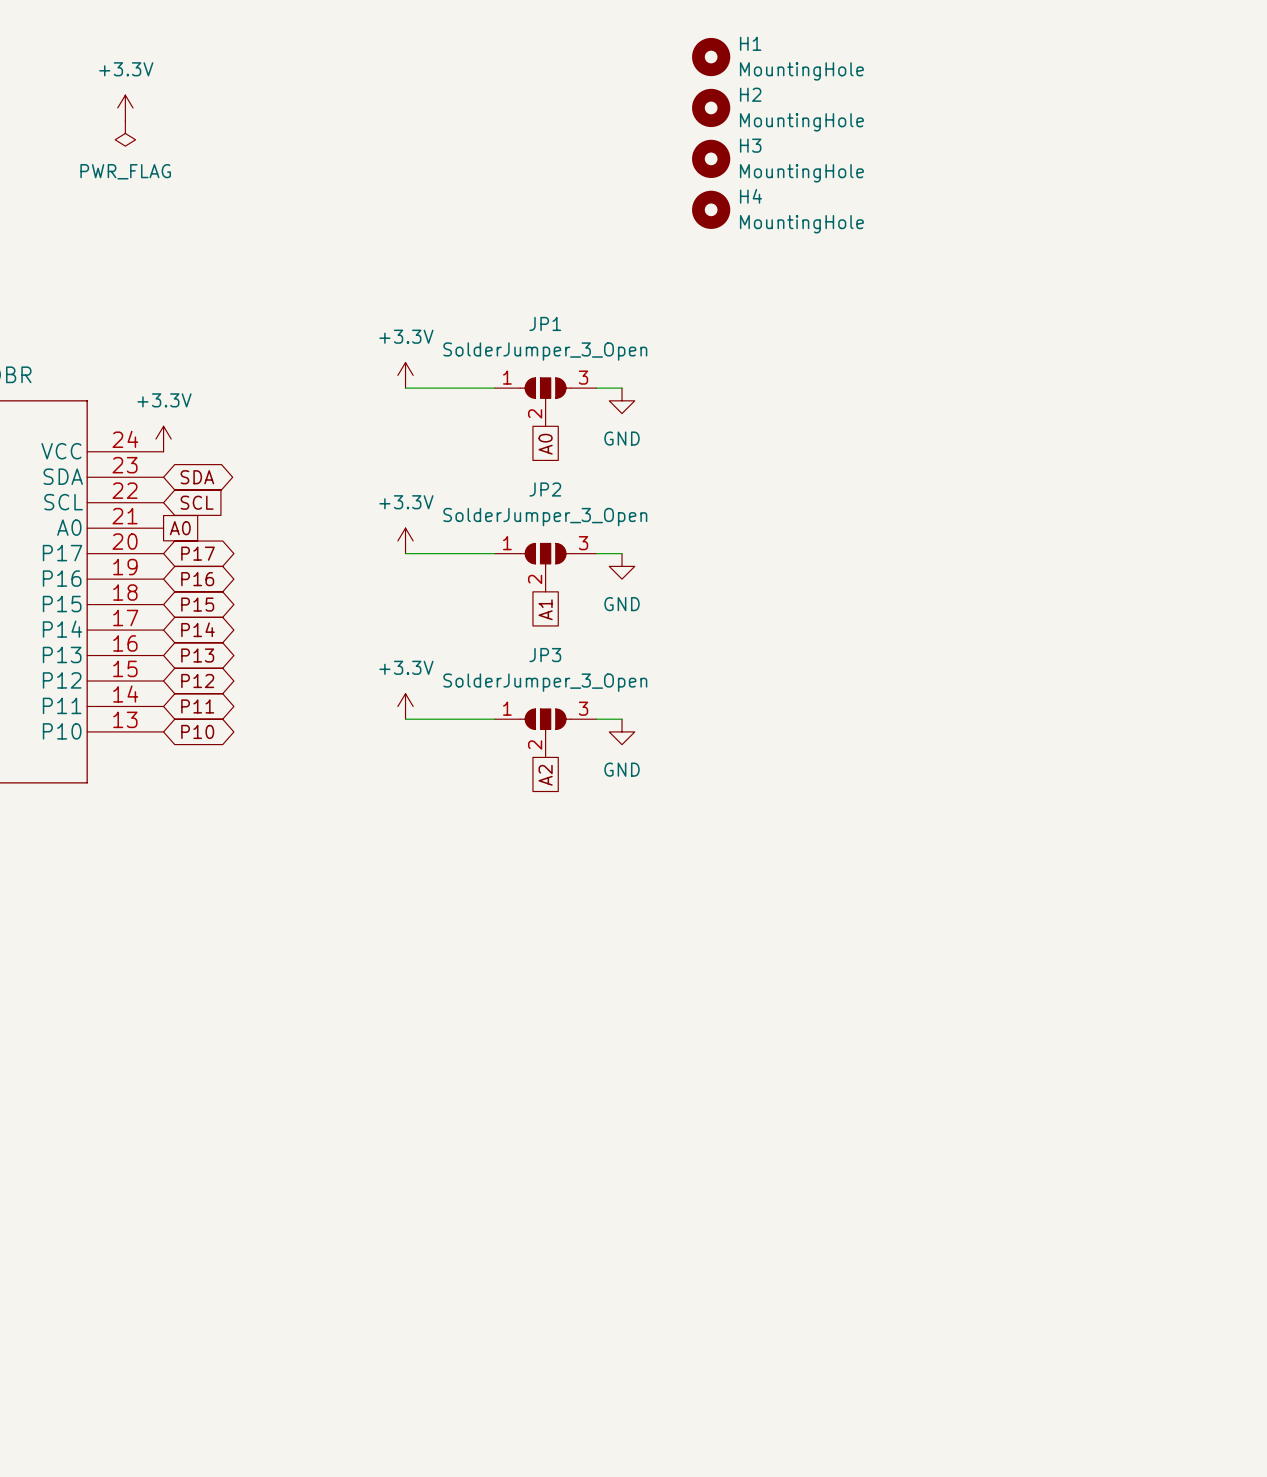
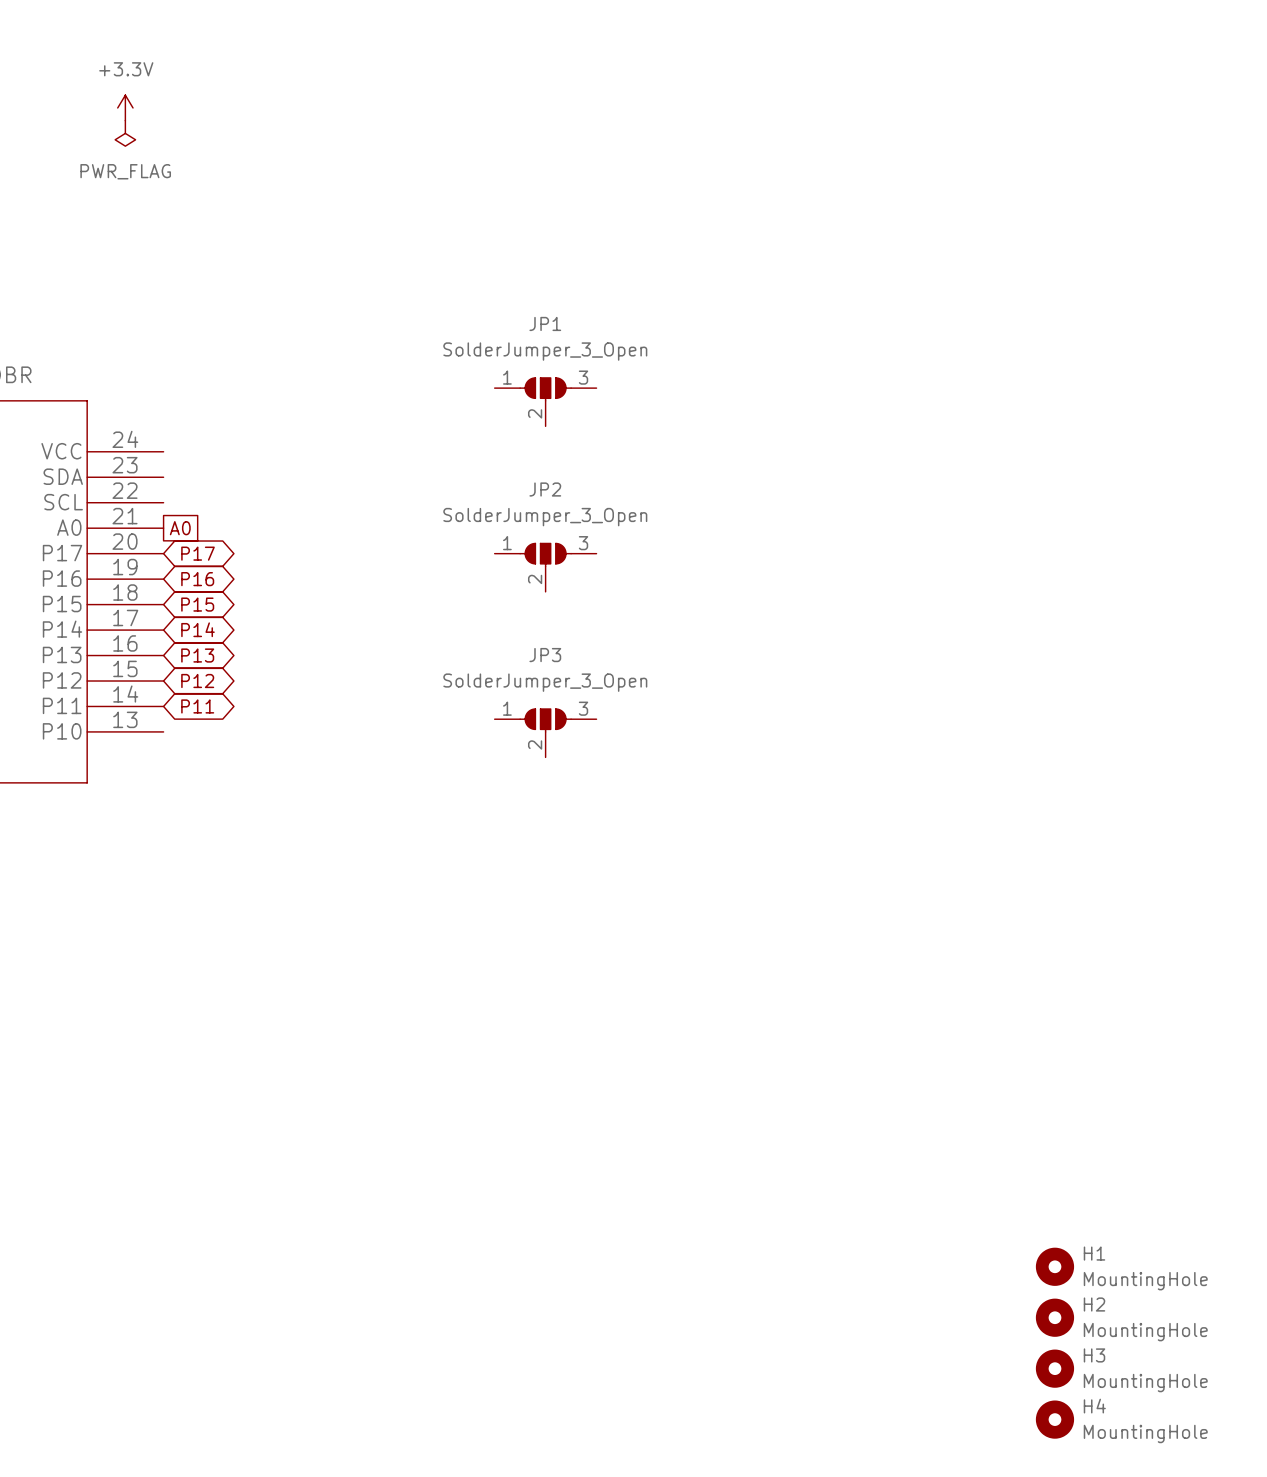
H1 position: (711, 57) -> (1054, 1266)
H2 position: (711, 107) -> (1054, 1317)
H3 position: (711, 158) -> (1054, 1368)
H4 position: (711, 209) -> (1054, 1419)
power symbol: +3.3V (405, 375) -> none
wire: (405, 388) (494, 388) -> none
wire: (596, 388) (622, 388) -> none
power symbol: GND (622, 400) -> none
power symbol: +3.3V (163, 439) -> none
global label: A0 (545, 444) -> none
global label: SDA (197, 477) -> none
global label: SCL (197, 502) -> none
power symbol: +3.3V (405, 540) -> none
wire: (405, 553) (494, 553) -> none
wire: (596, 553) (622, 553) -> none
power symbol: GND (622, 566) -> none
global label: A1 (545, 609) -> none
power symbol: +3.3V (405, 706) -> none
wire: (405, 719) (494, 719) -> none
wire: (596, 719) (622, 719) -> none
global label: P10 (197, 731) -> none
power symbol: GND (622, 731) -> none
global label: A2 (545, 775) -> none

